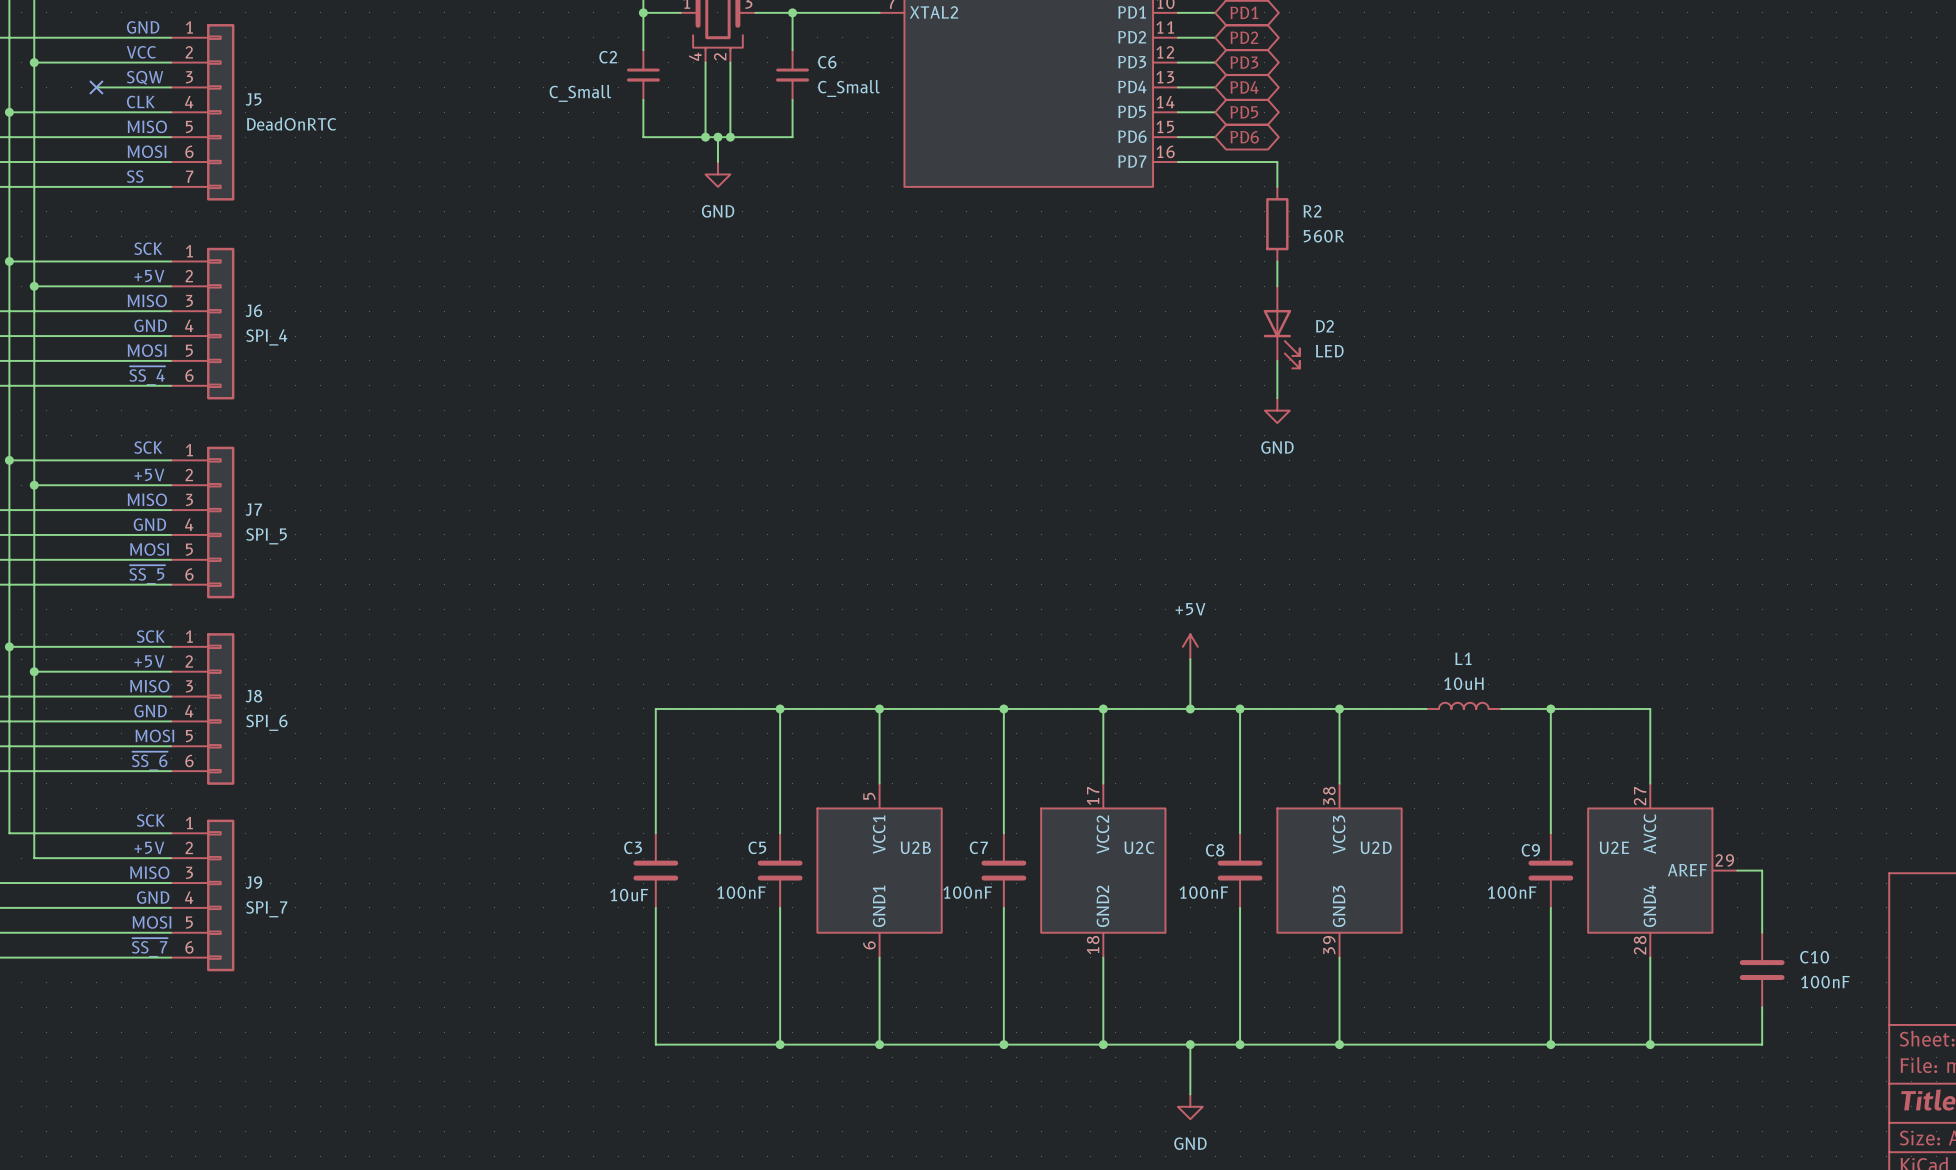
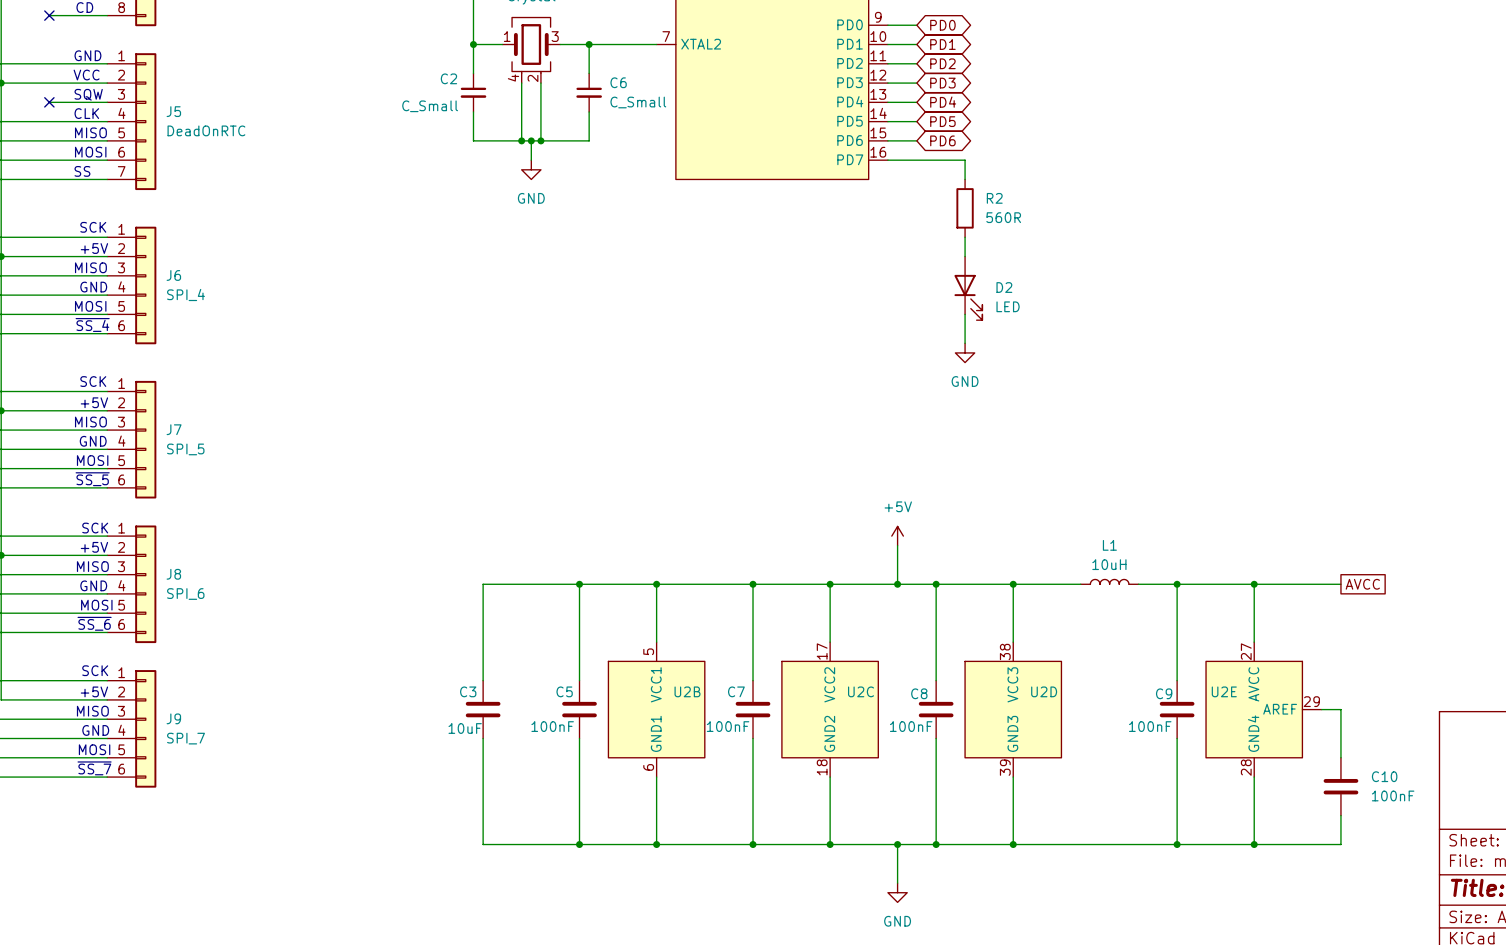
wire: none -> (1254, 584) (1340, 584)
junction: none -> (1254, 584)
global label: none -> AVCC (1362, 584)

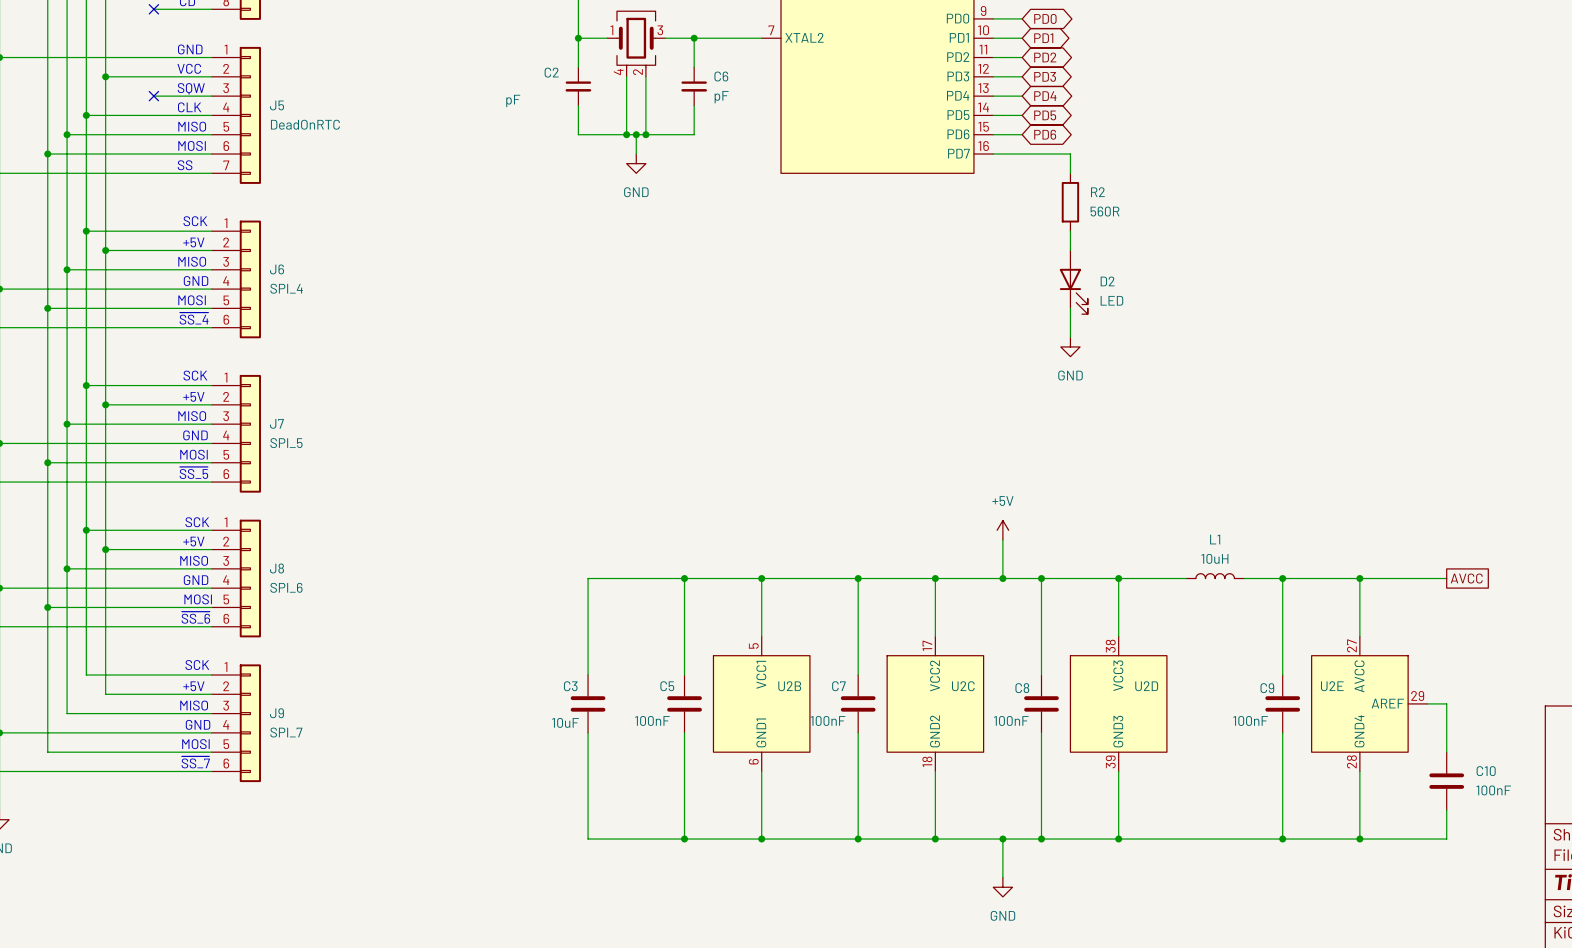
C6 value: C_Small (638, 102) -> pF (721, 97)
C2 value: C_Small (430, 106) -> pF (513, 100)

